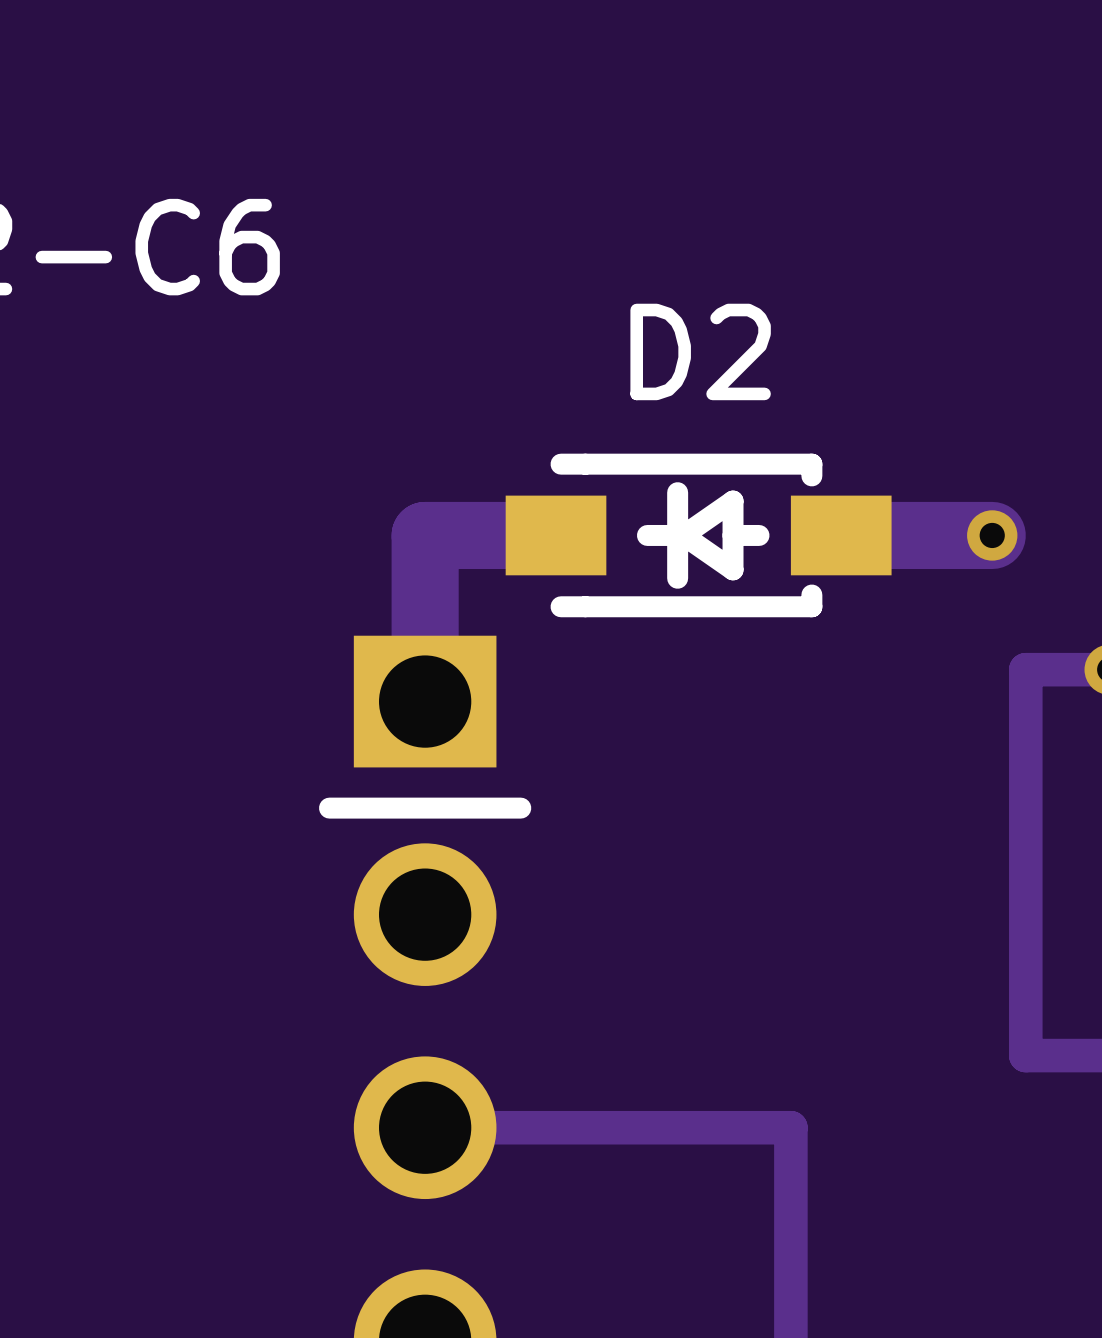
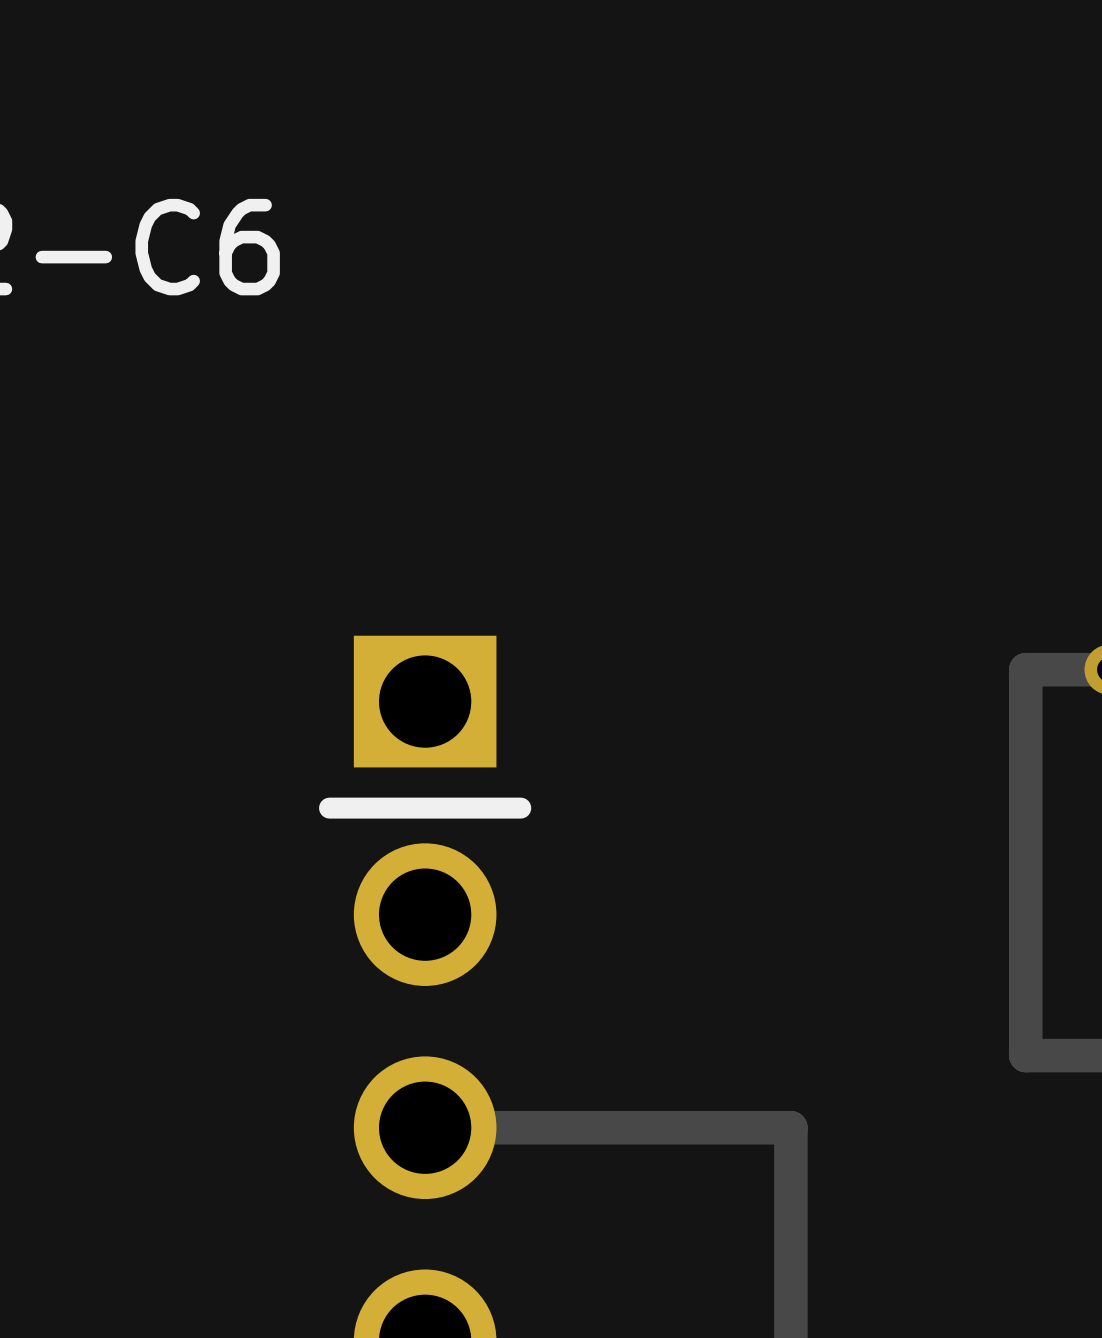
track: (556, 535) (425, 535) (425, 701) -> none
D2: (698, 535) -> none
track: (841, 535) (992, 535) -> none
via: (992, 535) -> none

